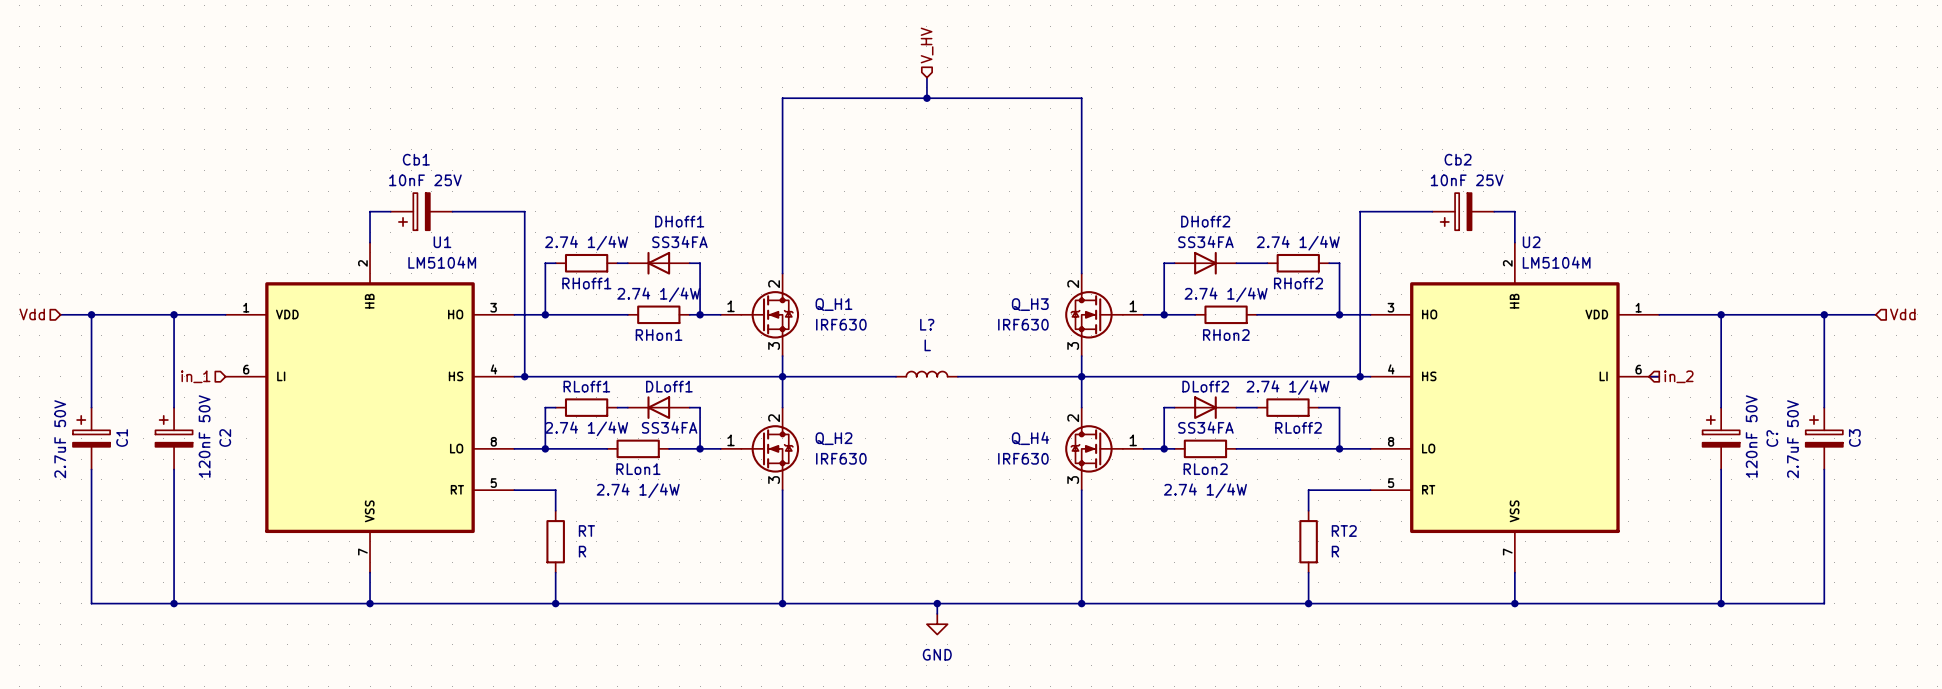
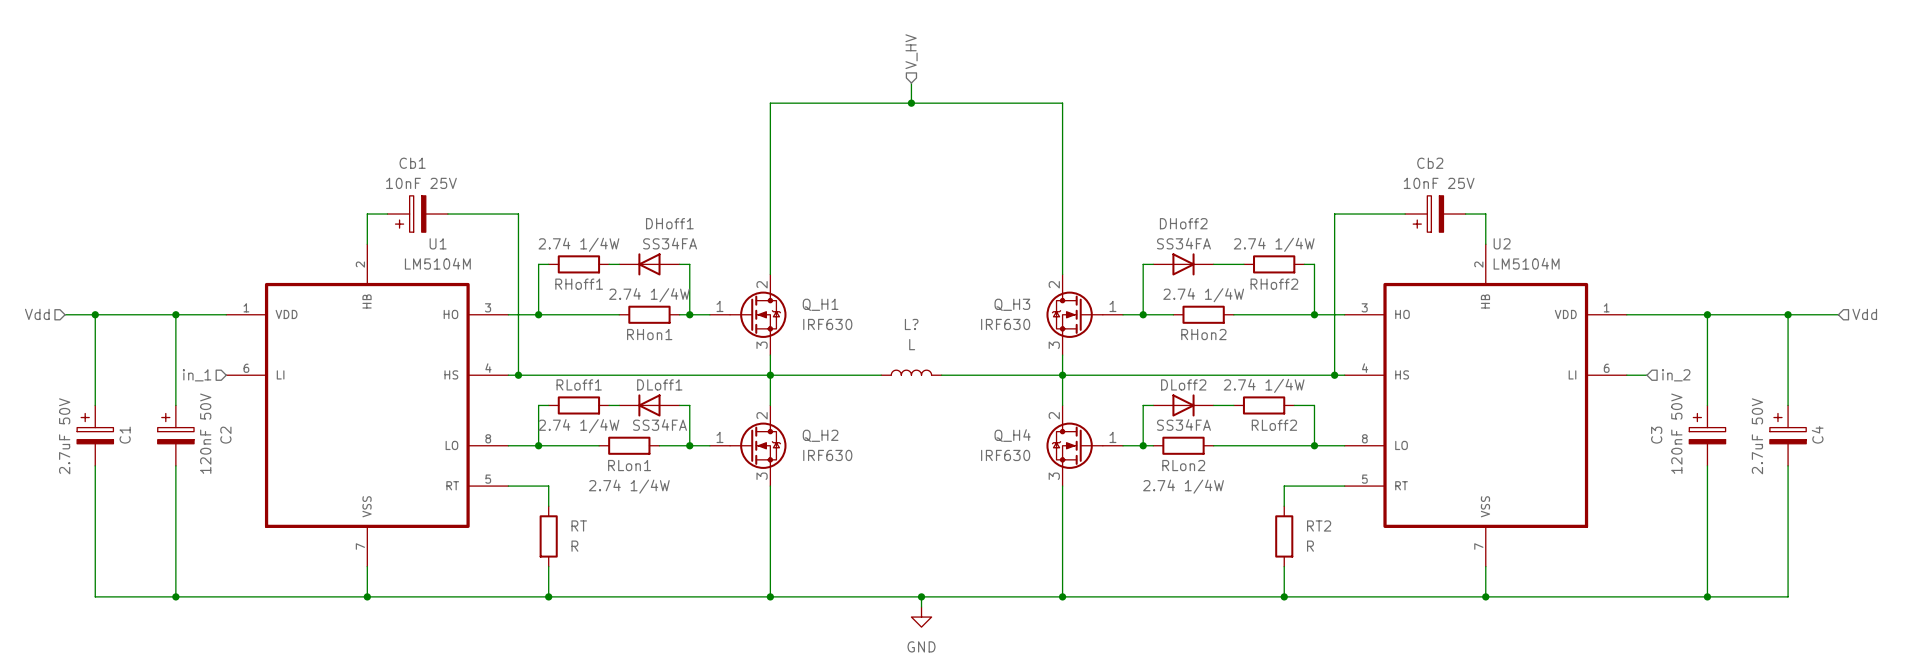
wire: (1721, 314) (1721, 407) -> (1707, 314) (1707, 405)
junction position: (1721, 314) -> (1707, 314)
hierarchical label position: in_2 (1678, 376) -> in_2 (1676, 375)
C?: 120nF 50V (1721, 438) -> none
C3: none -> 120nF 50V (1707, 435)
C3 name: C3 (1854, 438) -> C4 (1817, 434)
wire: (1721, 469) (1721, 603) -> (1707, 465) (1707, 596)
junction position: (1721, 603) -> (1707, 596)

